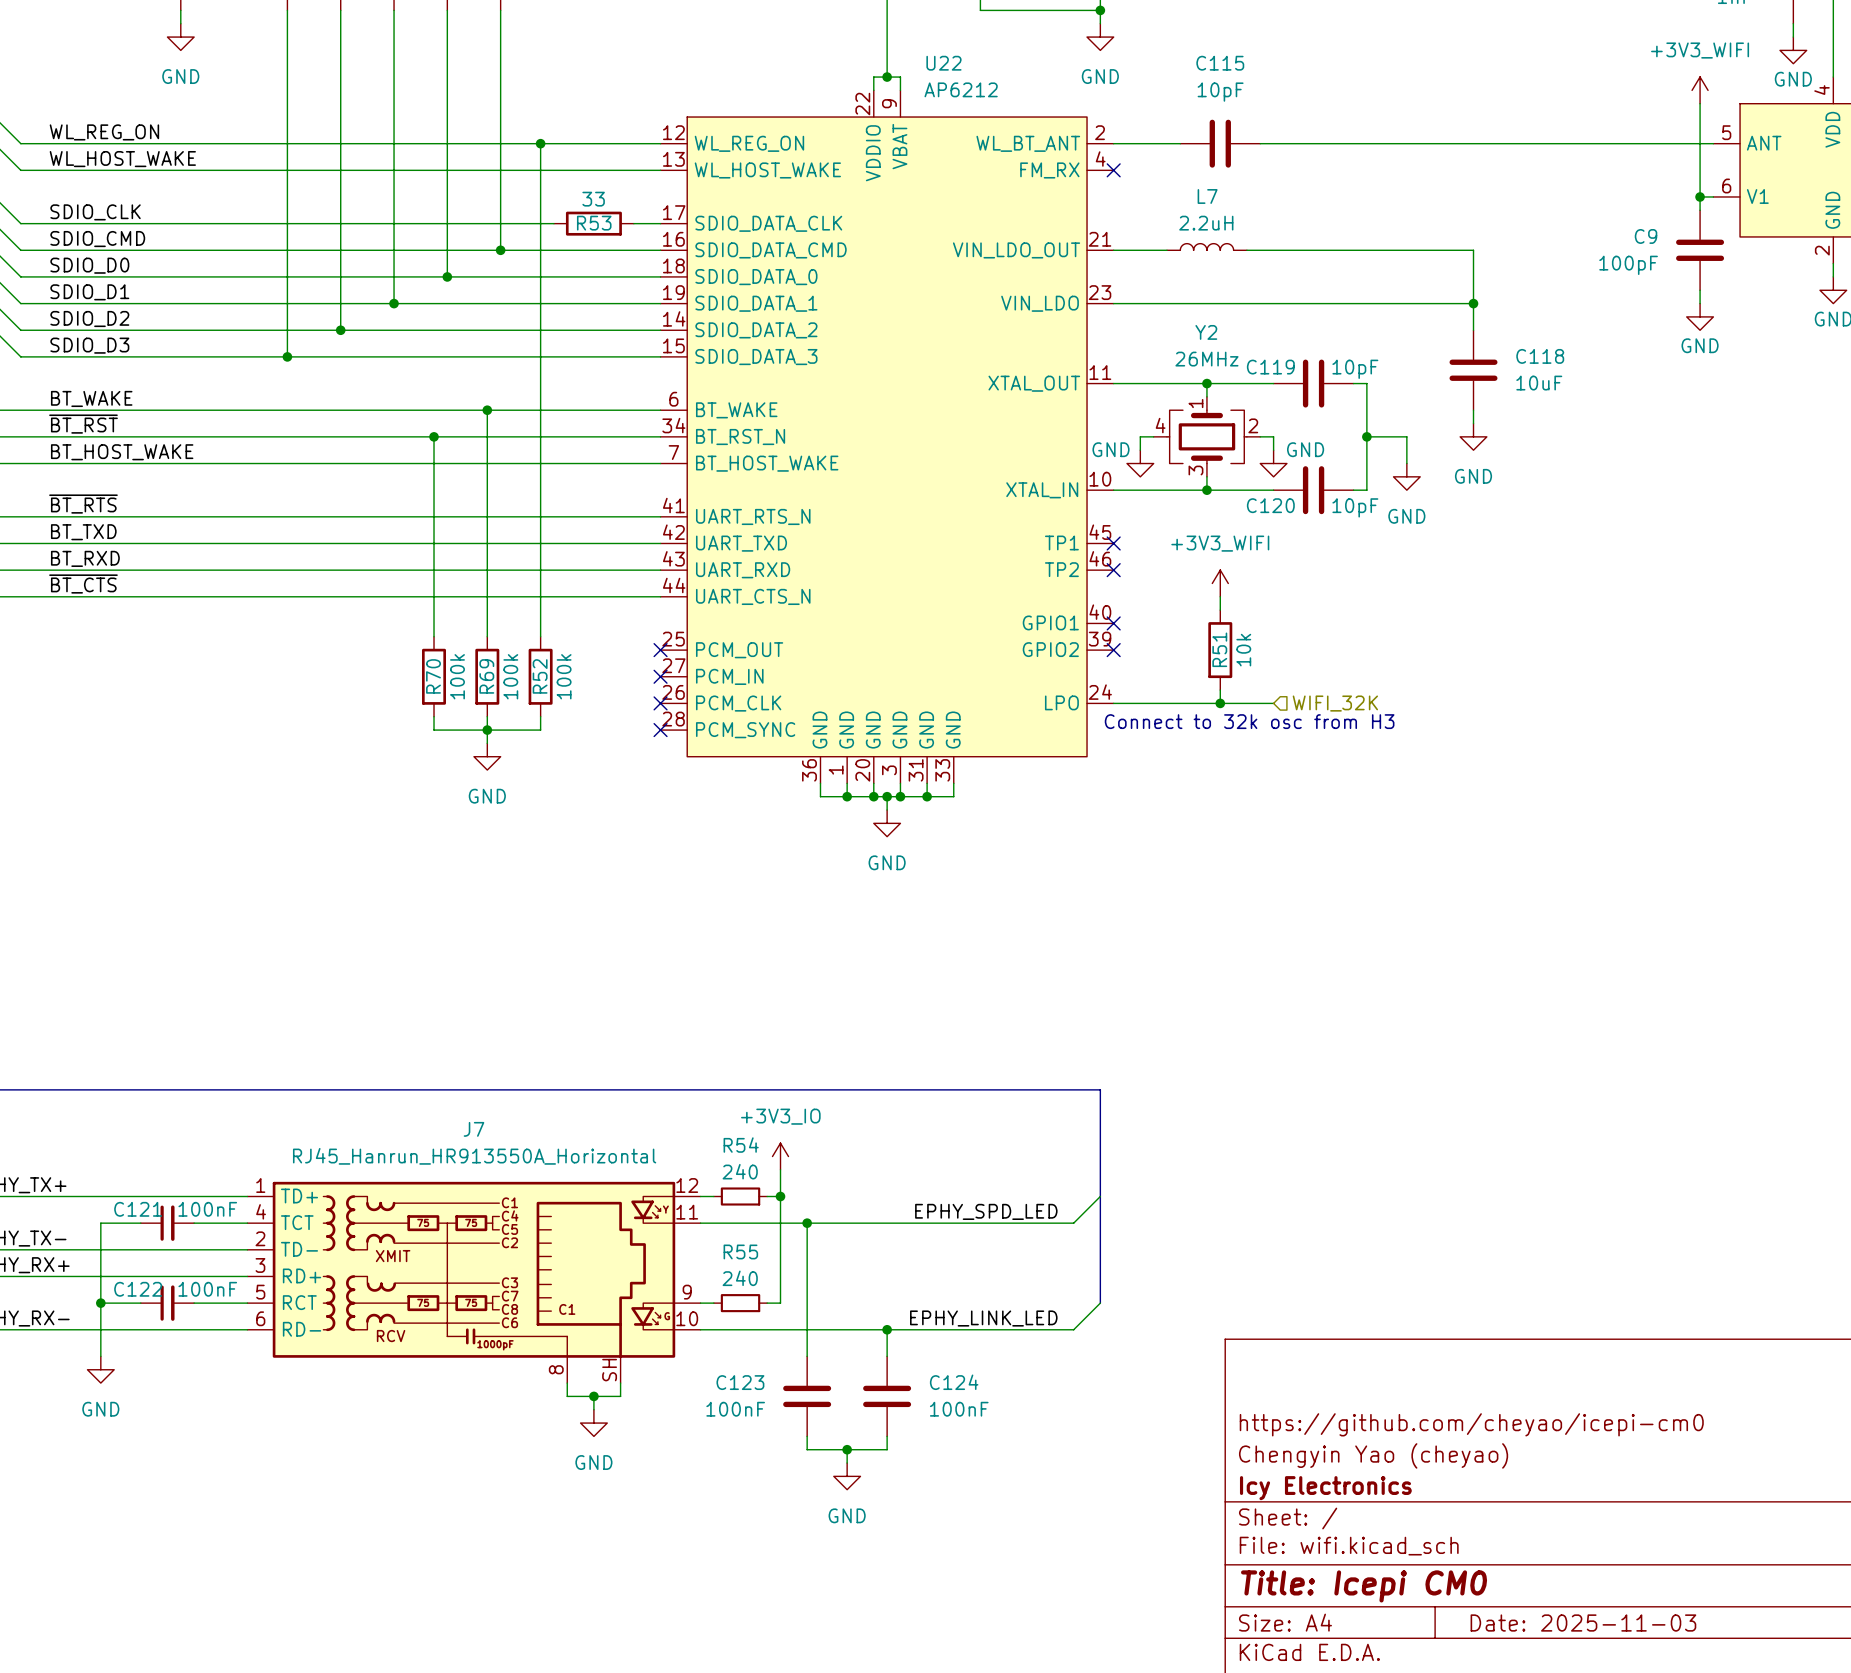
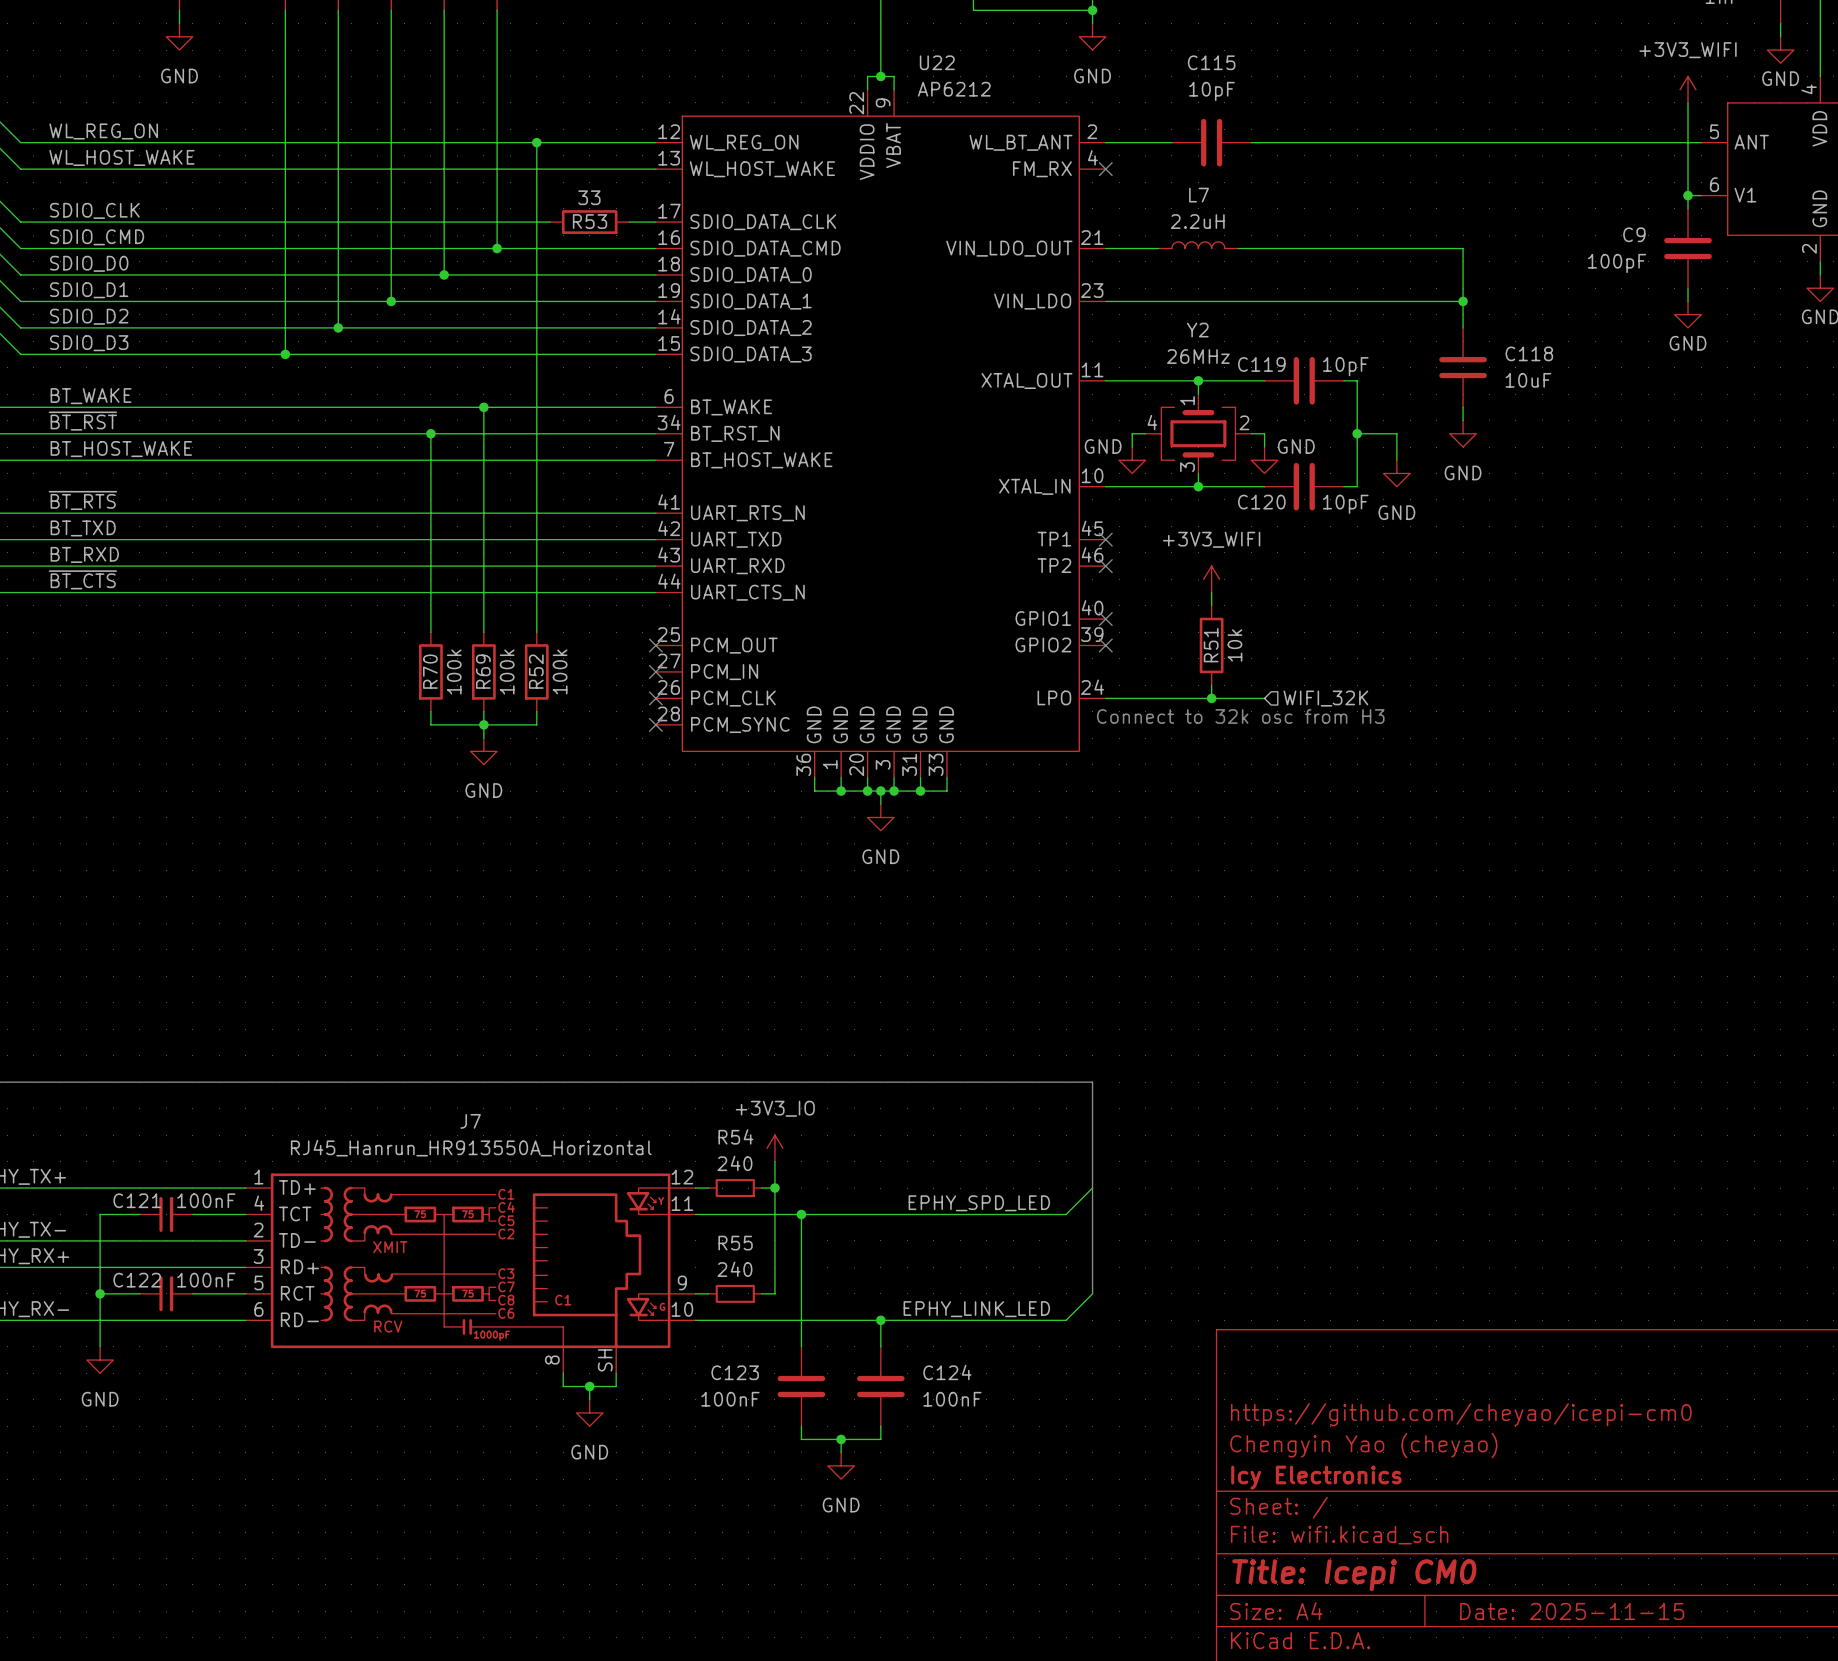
title block: Date: 2025-11-03 (1583, 1623) -> Date: 2025-11-15 (1572, 1611)

